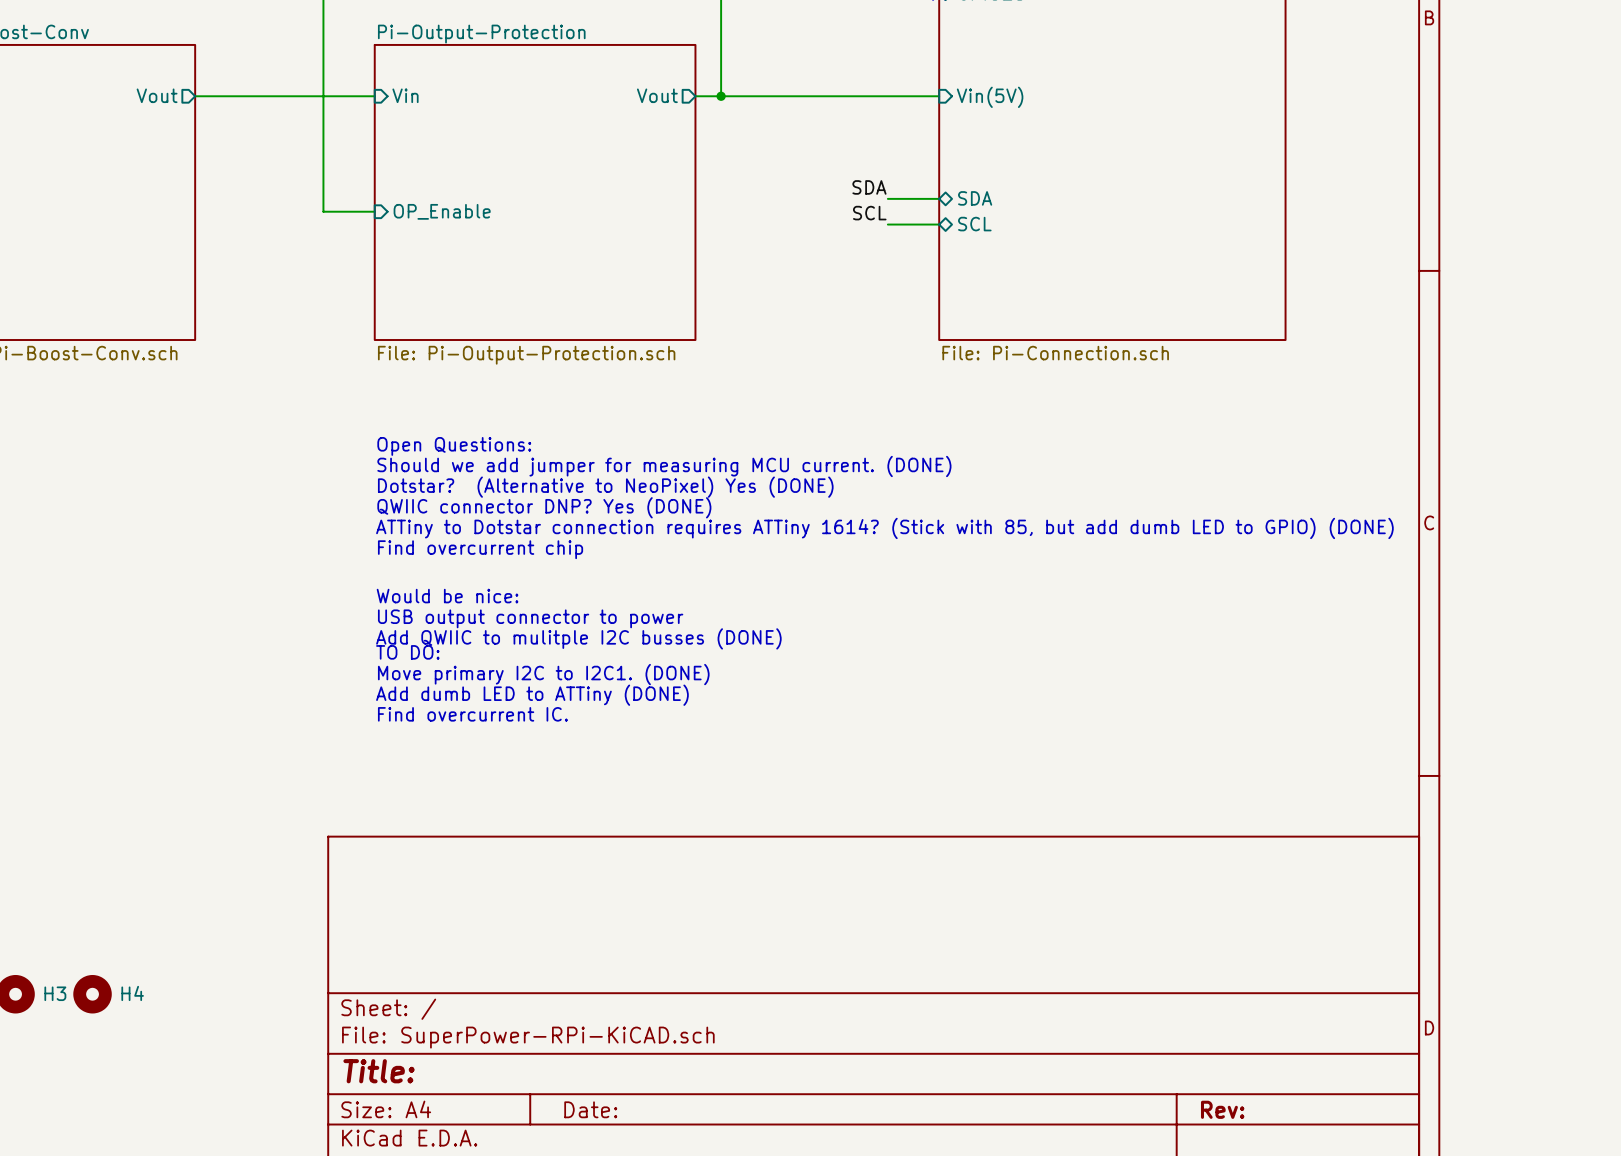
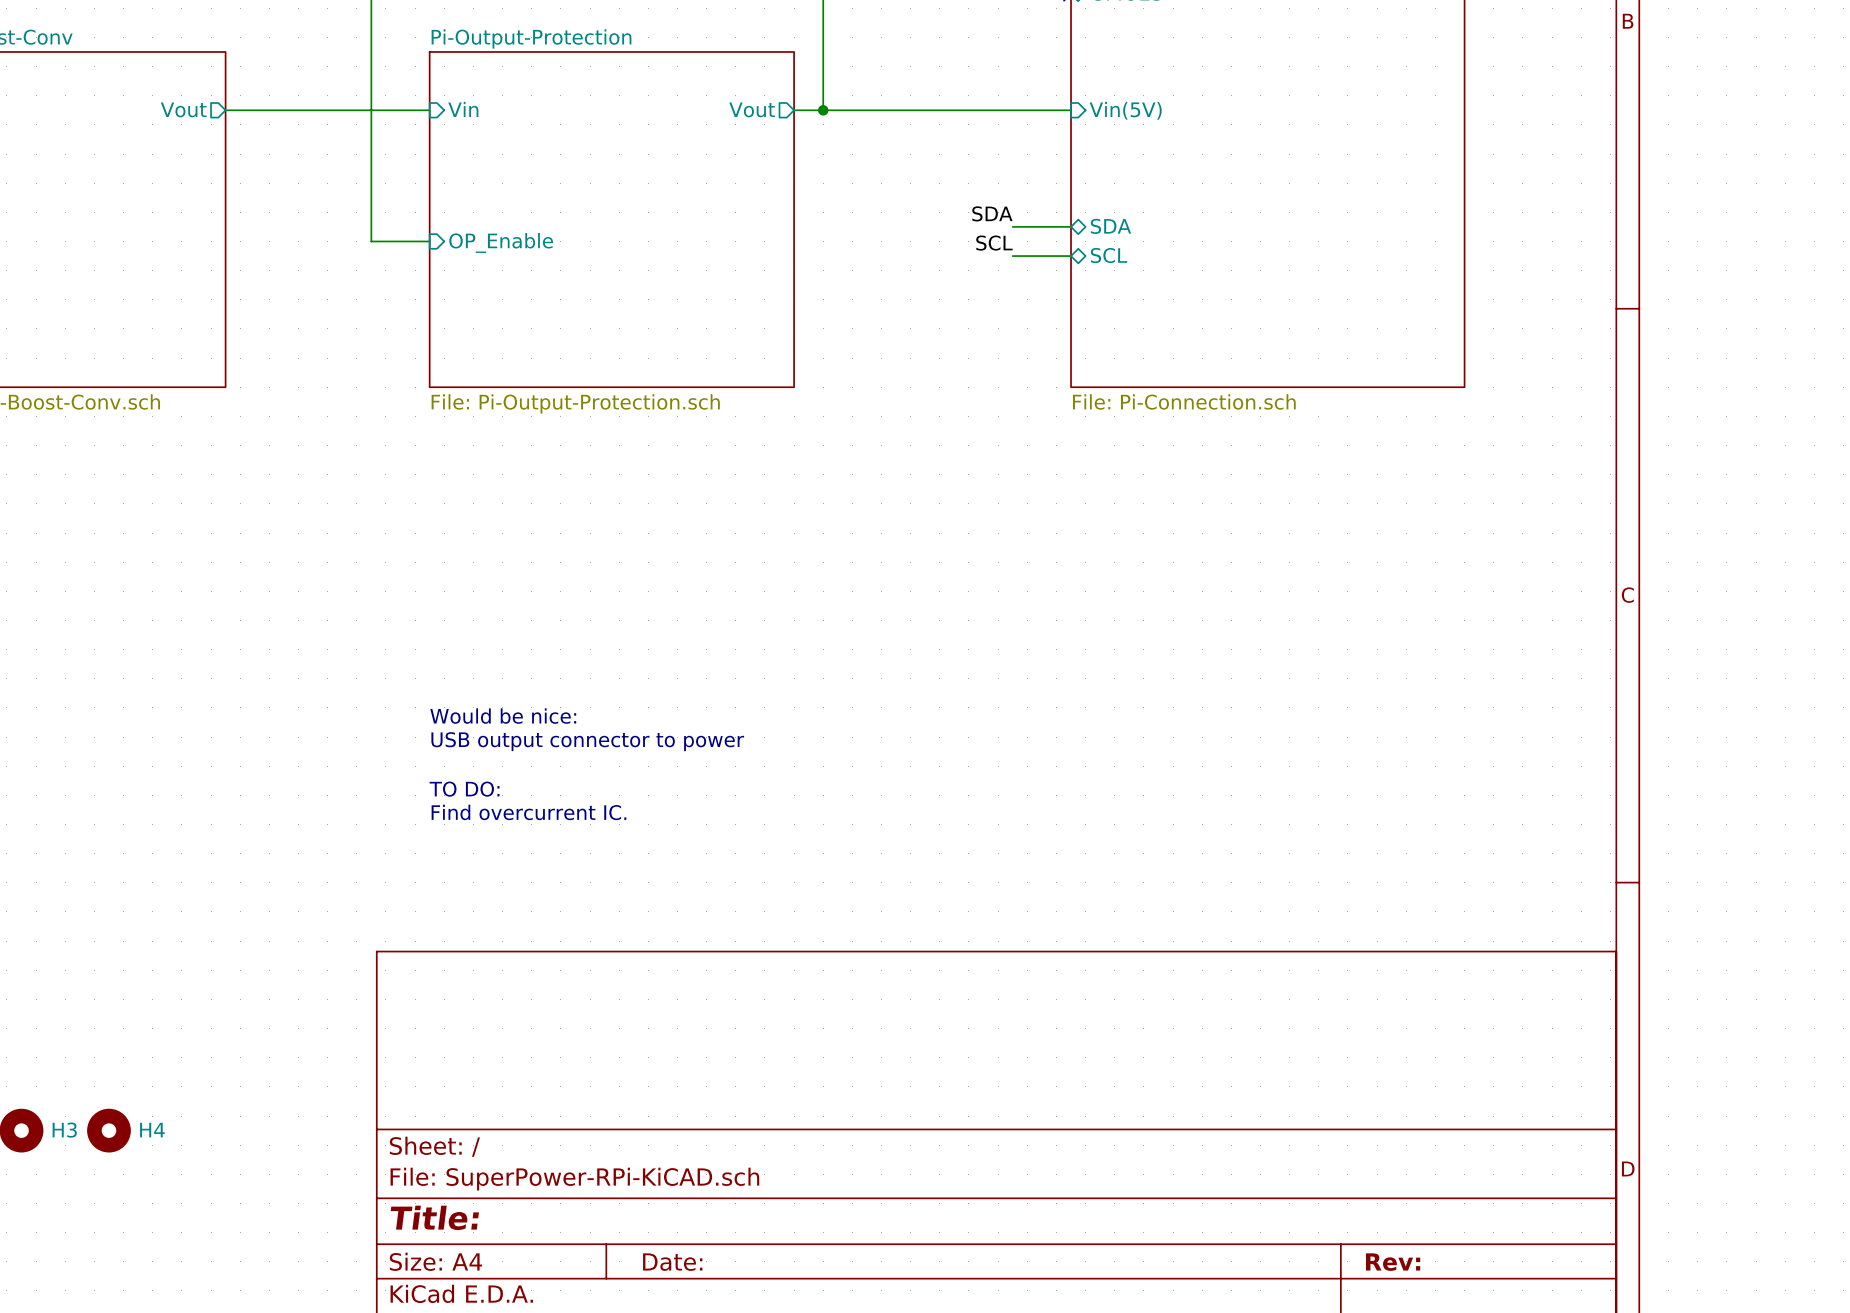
text: Open Questions: (454, 446) -> none
text: Should we add jumper for measuring MCU current. (DONE) (664, 466) -> none
text: Dotstar? (Alternative to NeoPixel) Yes (DONE) (605, 487) -> none
text: QWIIC connector DNP? Yes (DONE) (544, 507) -> none
text: ATTiny to Dotstar connection requires ATTiny 1614? (Stick with 85, but add dumb LED to GPIO) (DONE) (884, 528) -> none
text: Find overcurrent chip (480, 549) -> none
text position: Would be nice: (447, 596) -> Would be nice: (503, 716)
text position: USB output connector to power (530, 618) -> USB output connector to power (587, 741)
text: Add QWIIC to mulitple I2C busses (DONE) (578, 638) -> none
text: TO DO: (407, 652) -> none
text: Move primary I2C to I2C1. (DONE) (543, 674) -> none
text: Add dumb LED to ATTiny (DONE) (532, 695) -> TO DO: (464, 789)

